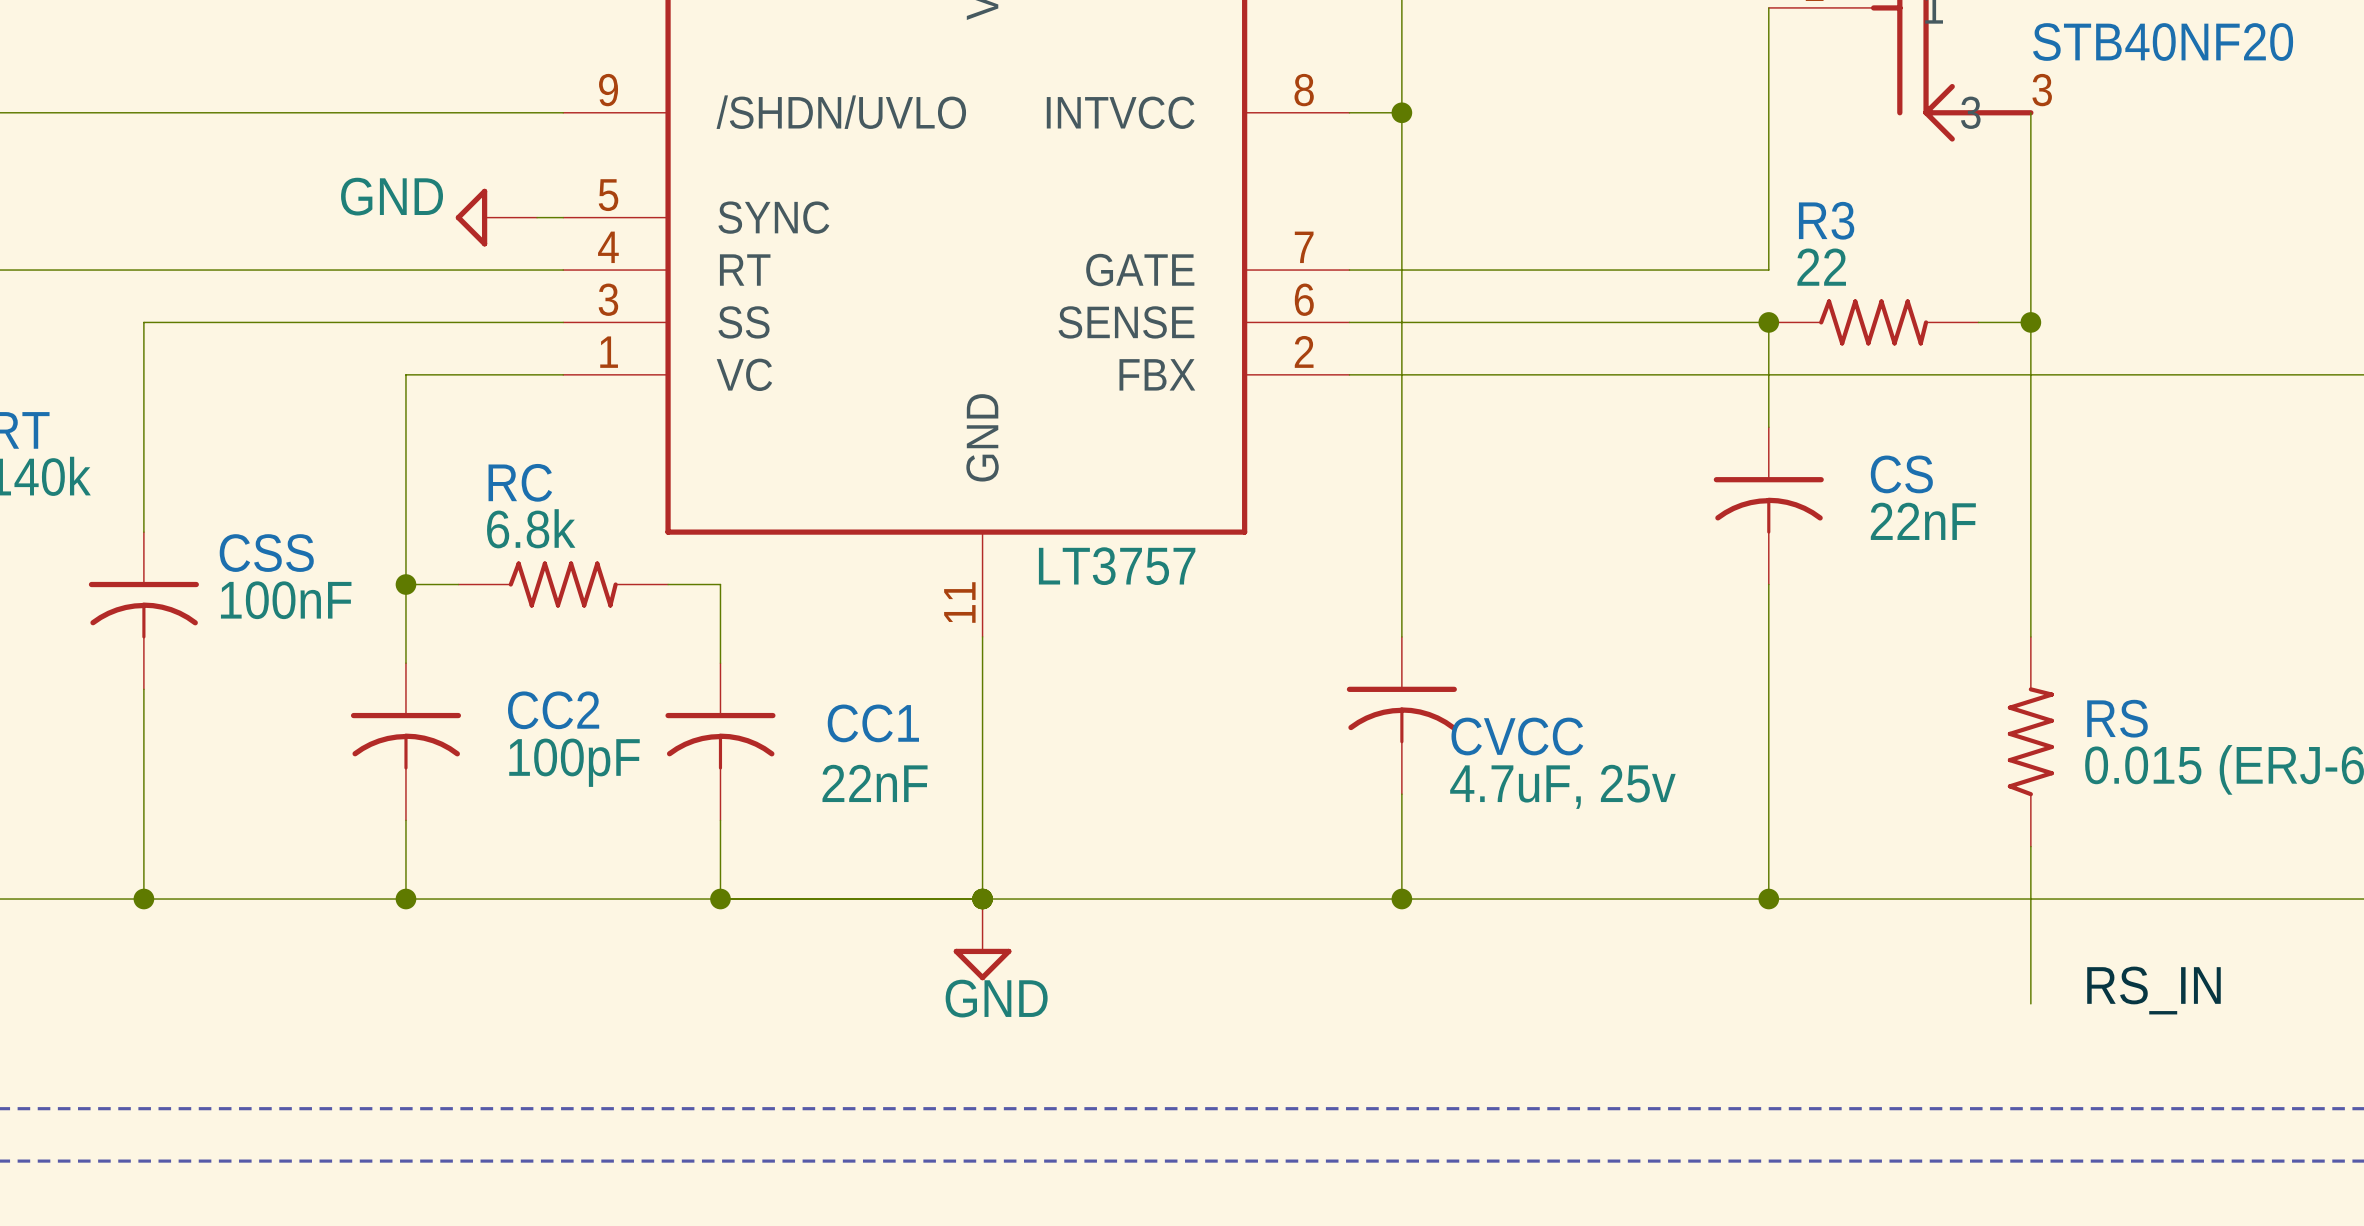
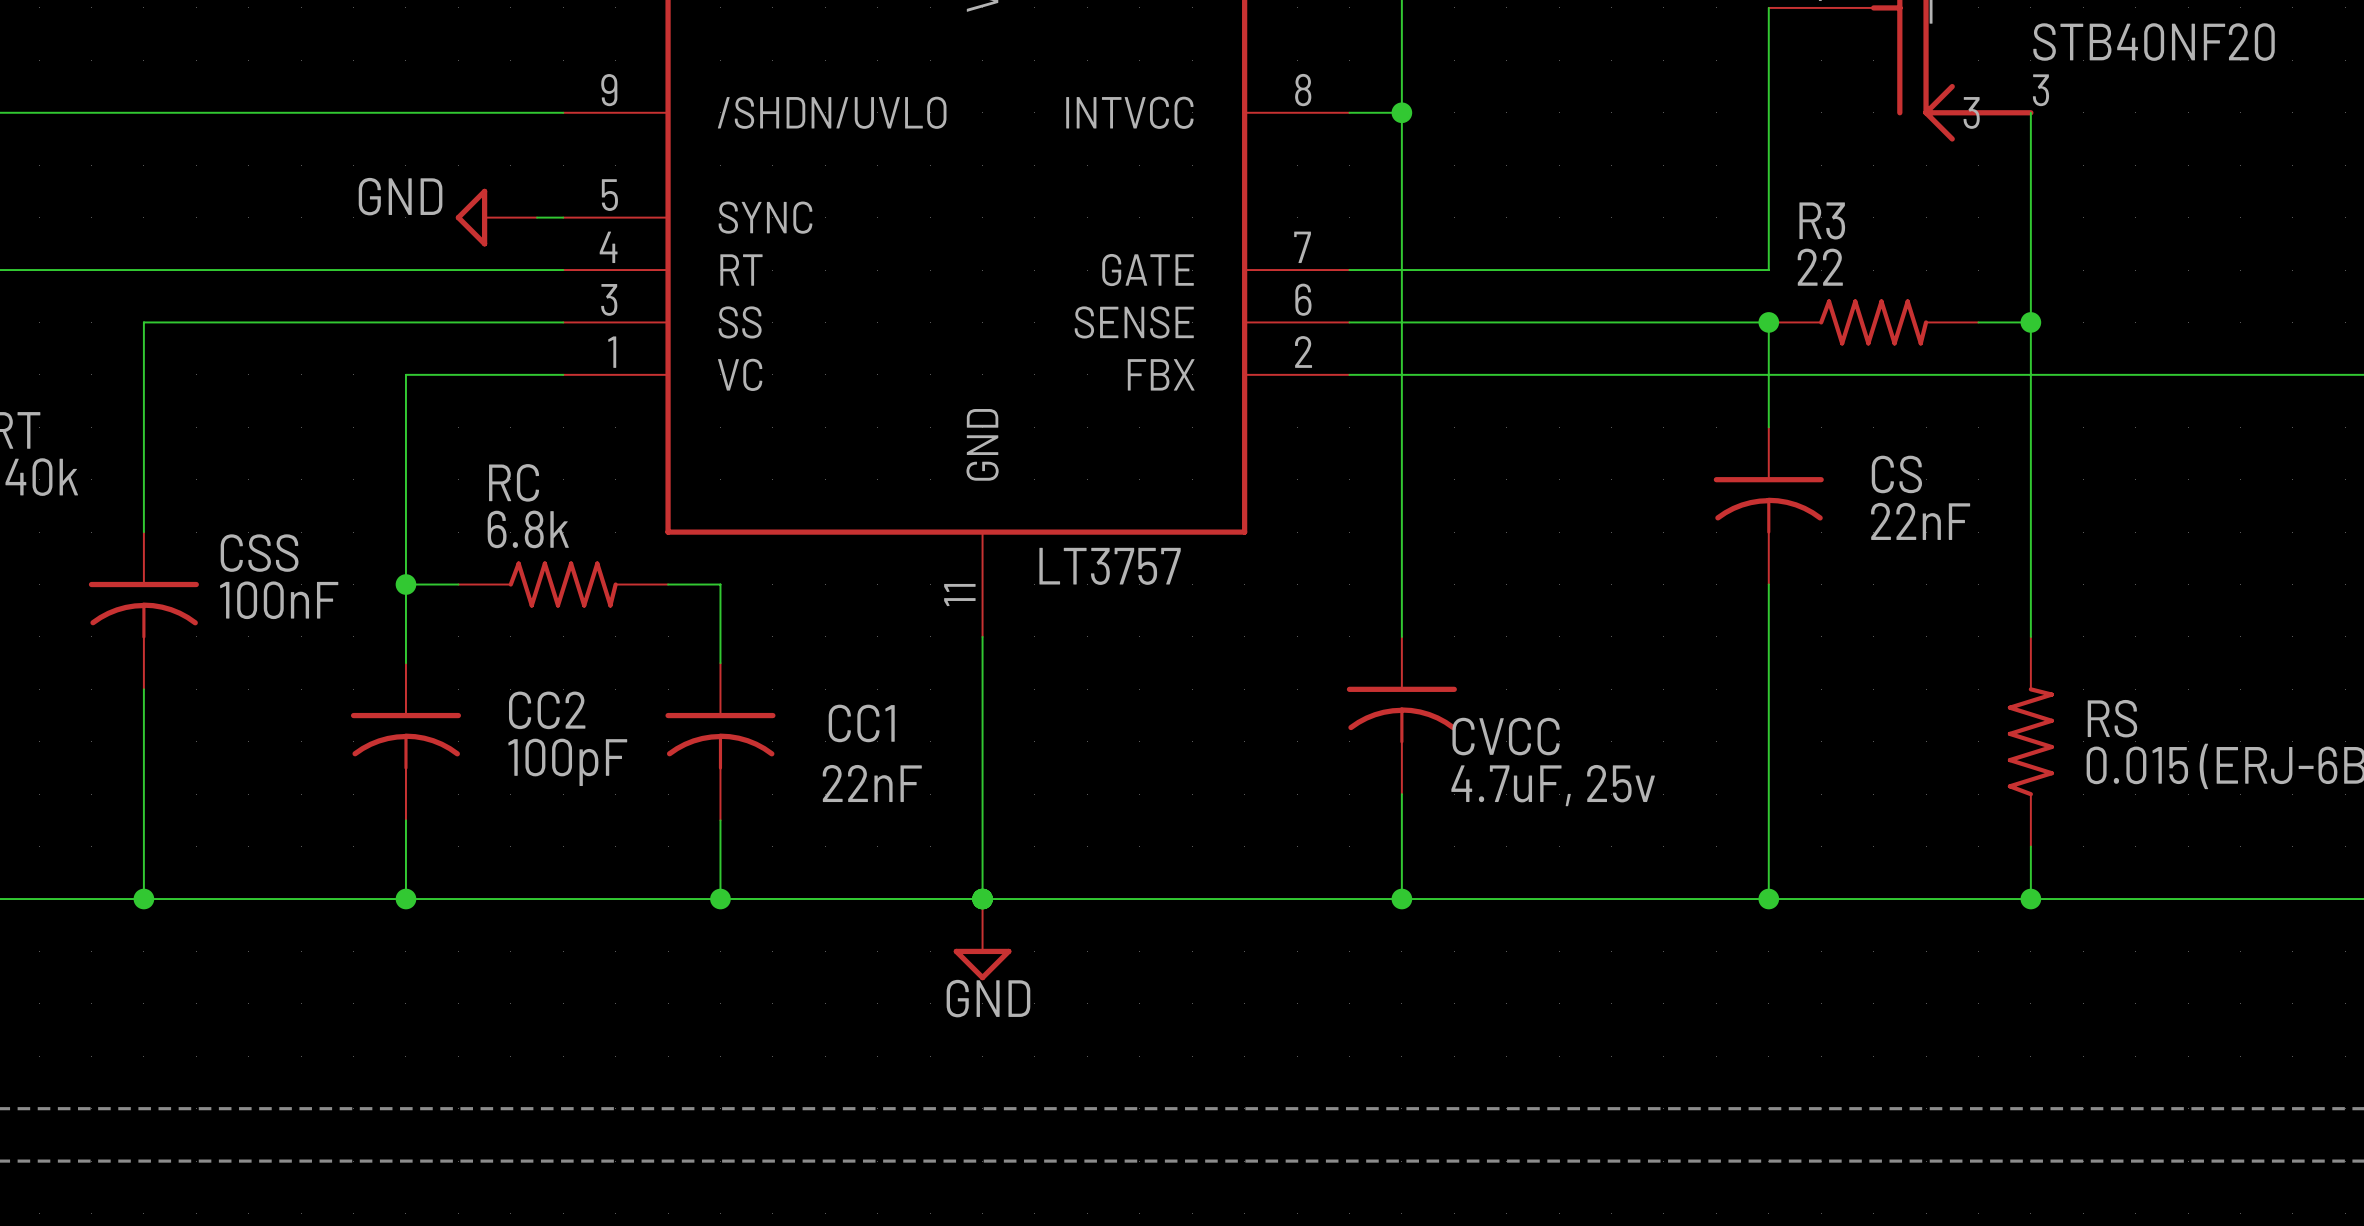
wire: (2030, 899) (2030, 1003) -> none
junction: none -> (2030, 899)
label: RS_IN (2153, 990) -> none

